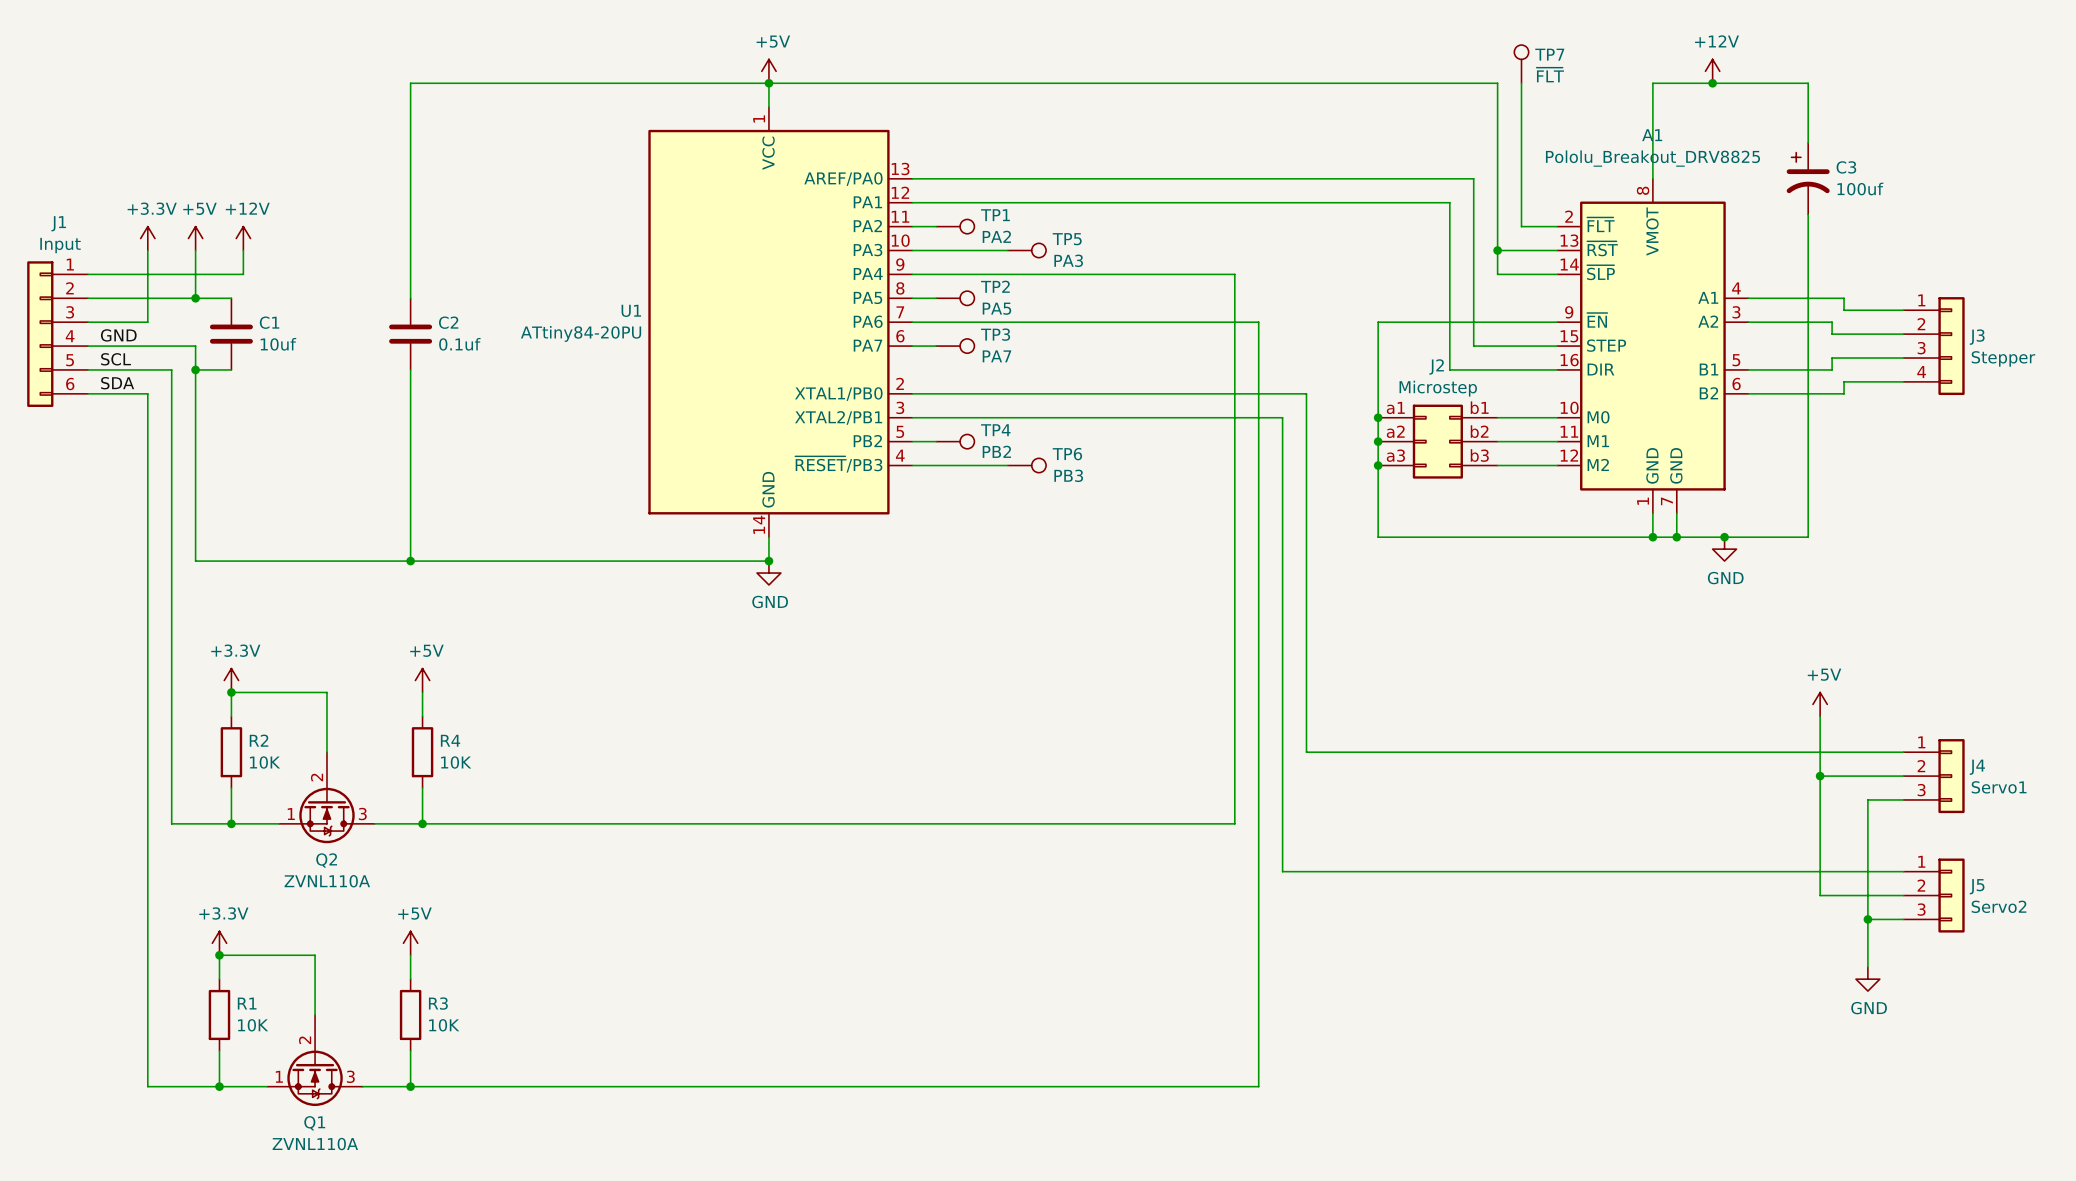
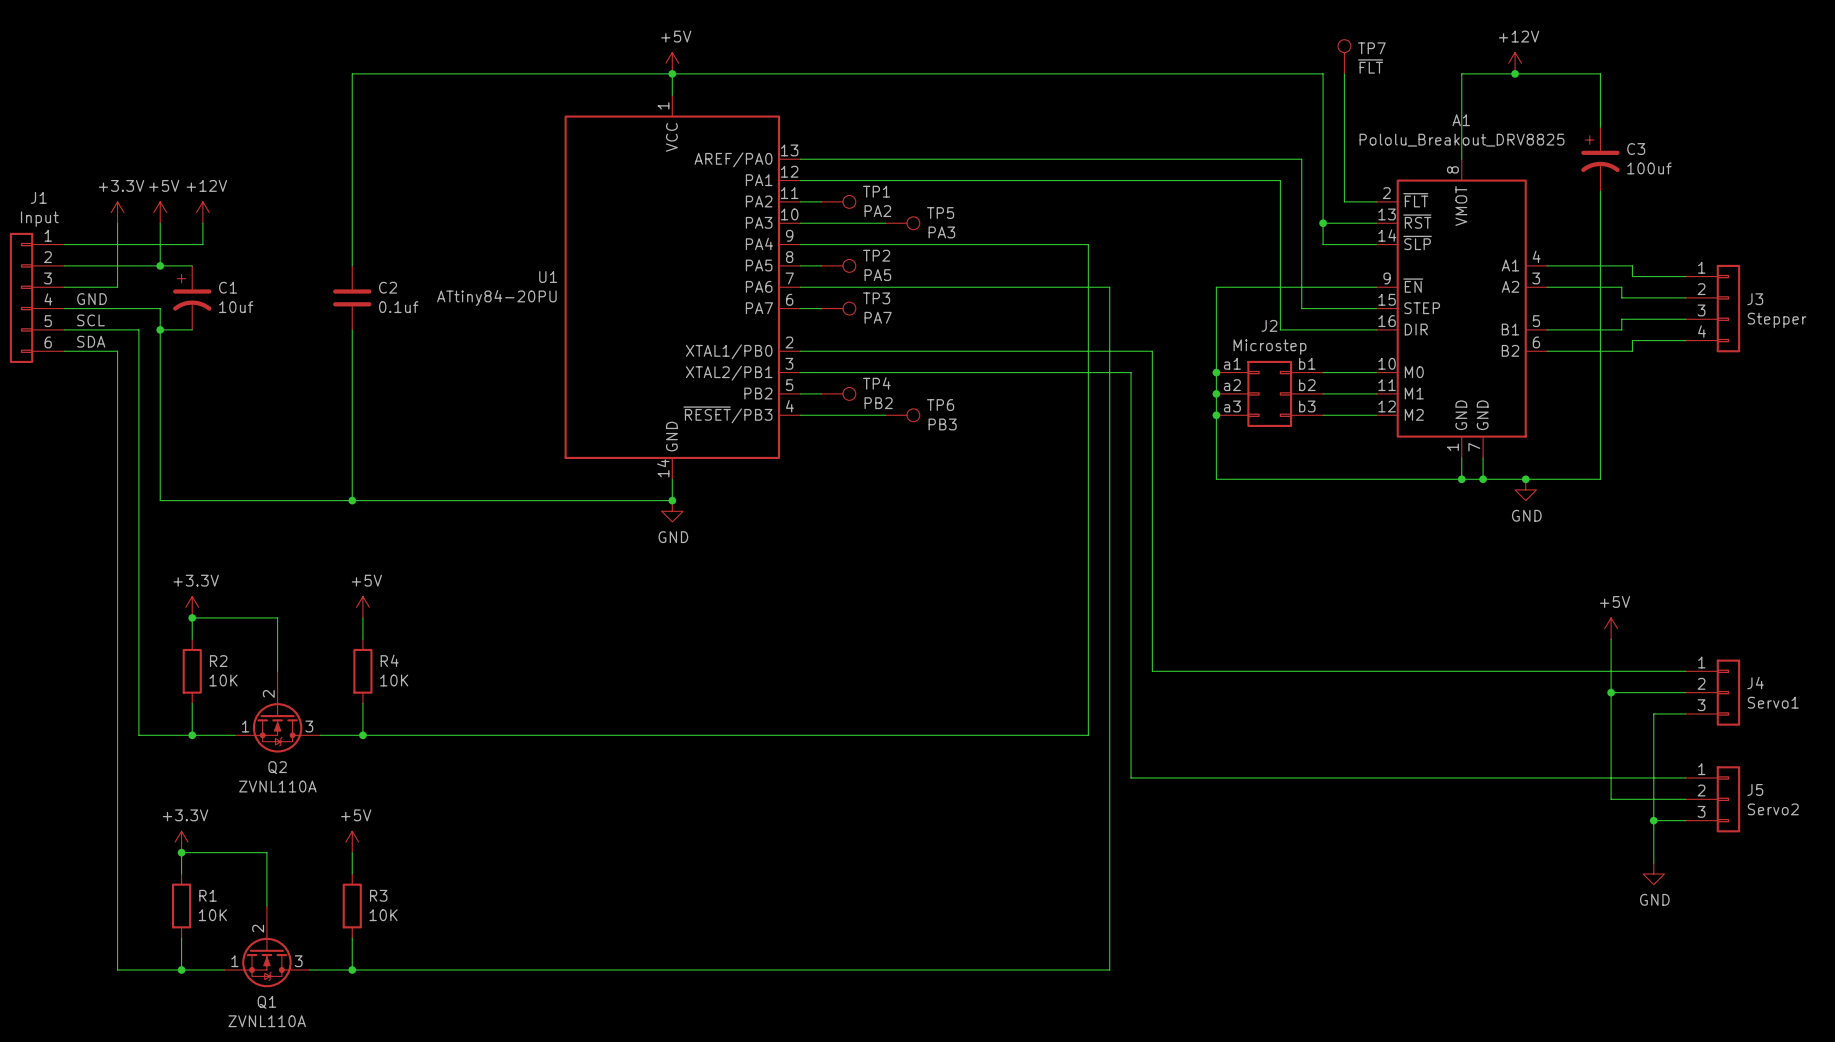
C1 symbol: [209, 298, 253, 370] -> [173, 265, 212, 330]

